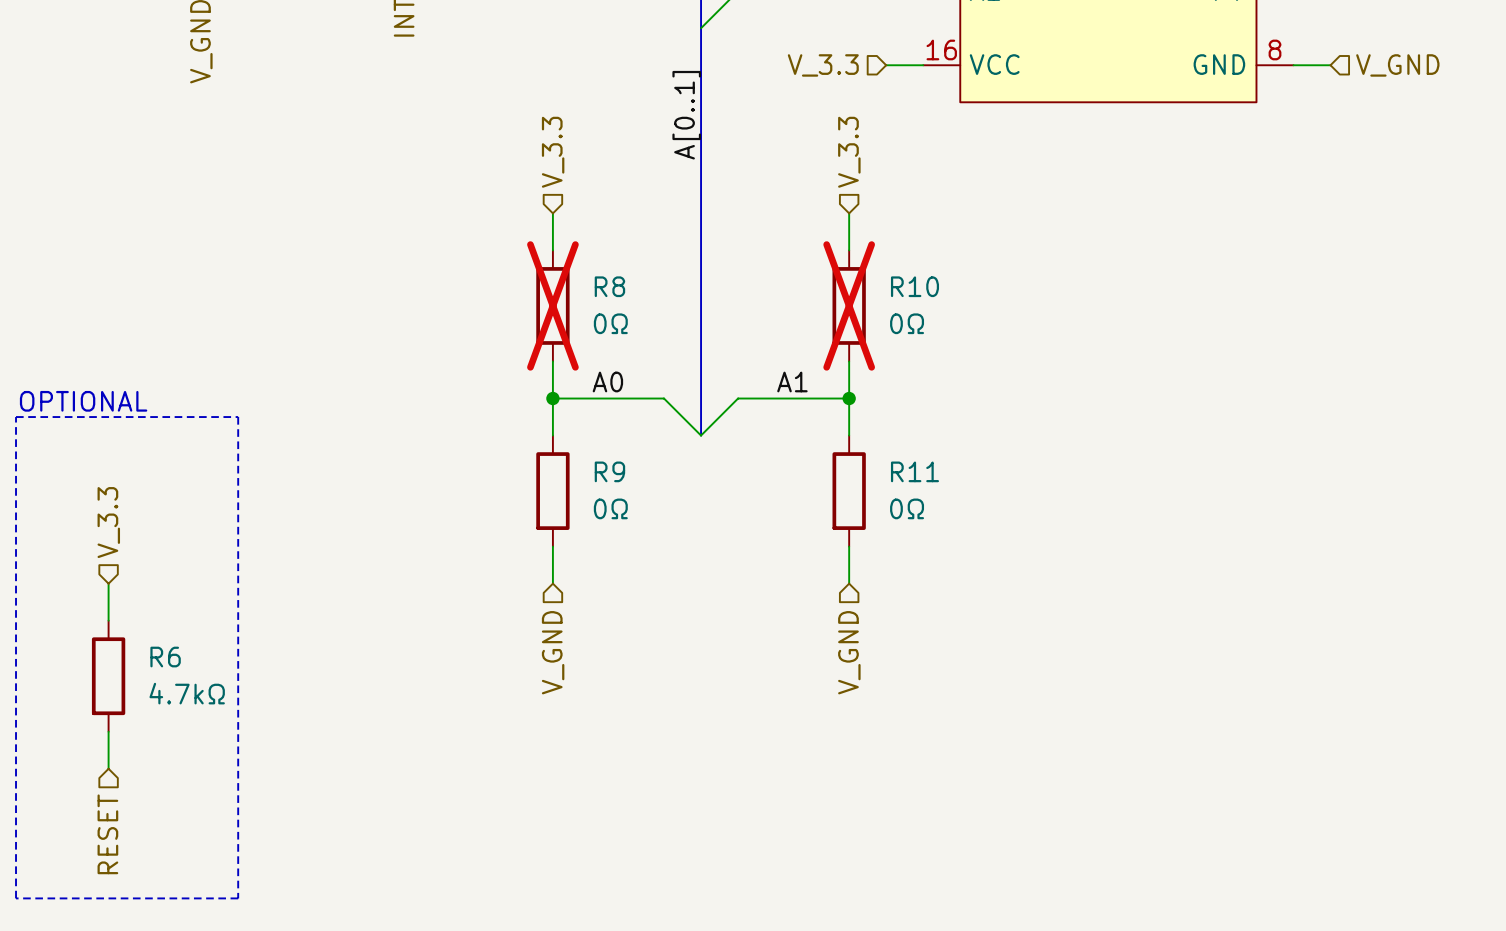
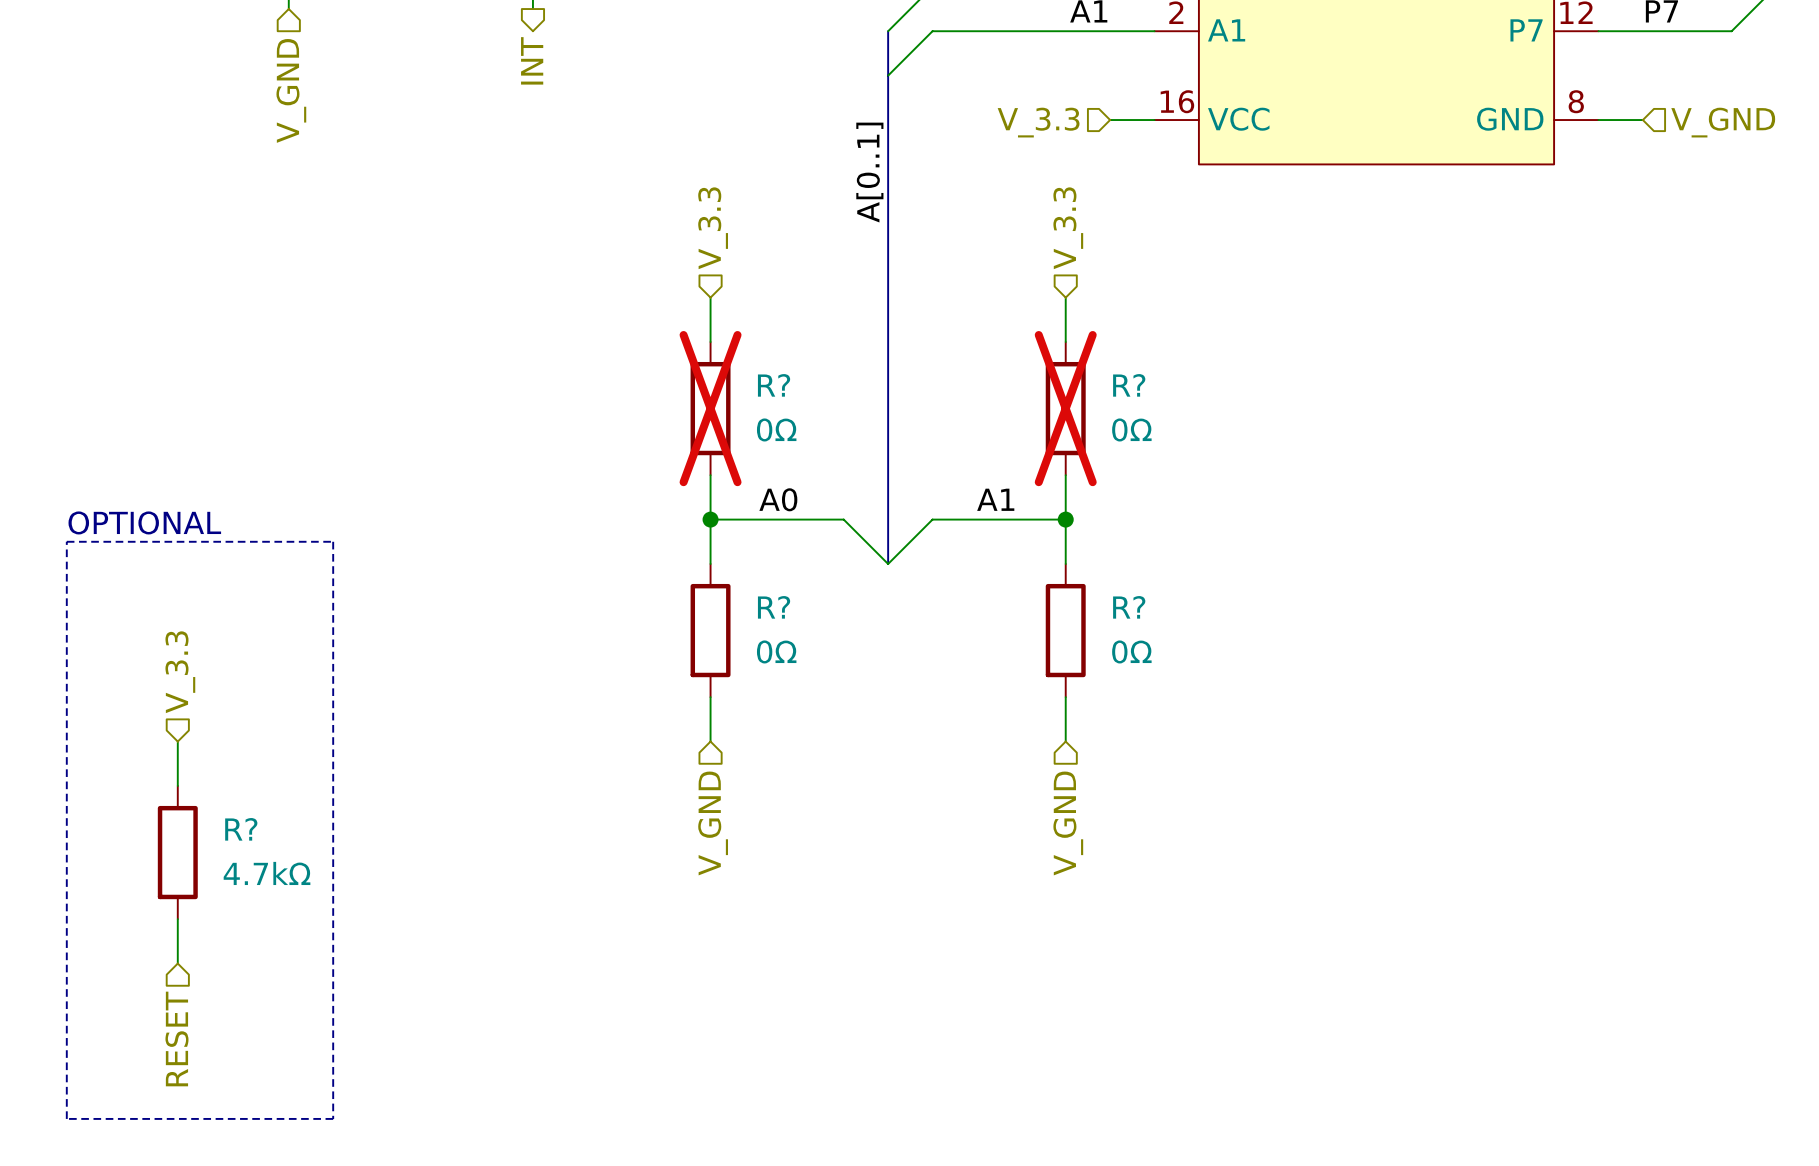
R8 name: R8 (609, 286) -> R? (774, 385)
R10 name: R10 (914, 286) -> R? (1129, 385)
R9 name: R9 (609, 471) -> R? (774, 607)
R11 name: R11 (914, 471) -> R? (1129, 607)
R6 name: R6 (165, 657) -> R? (241, 829)

